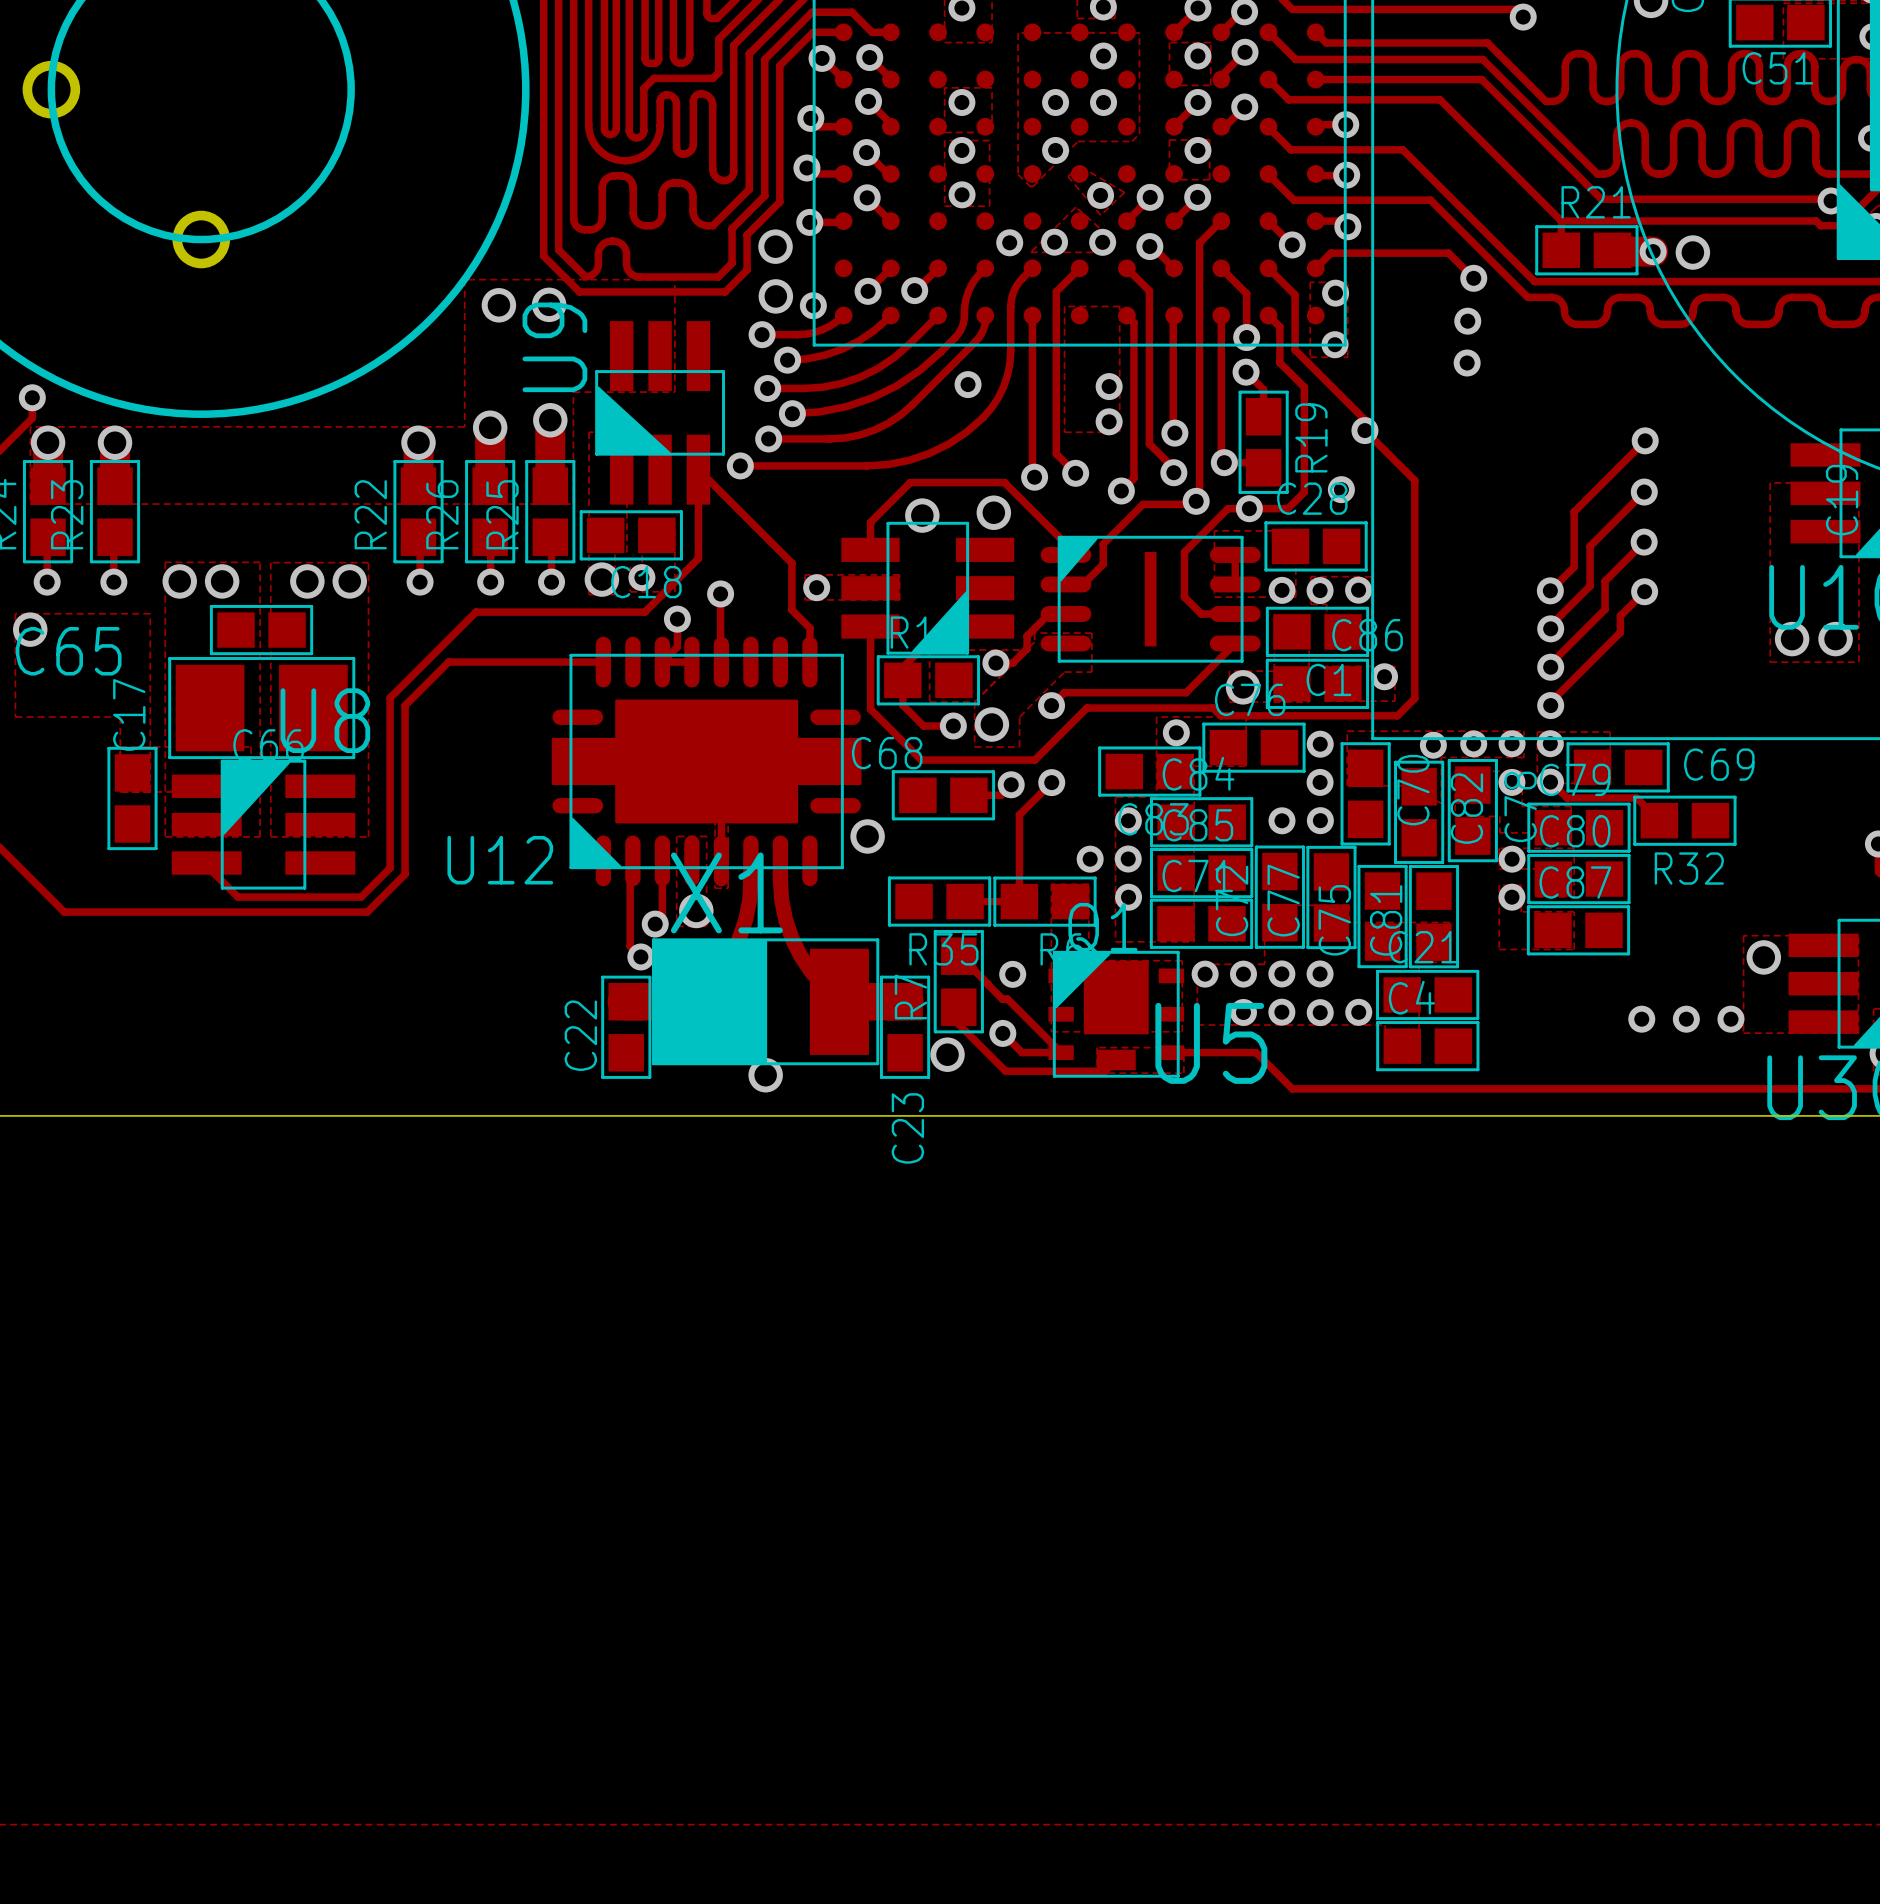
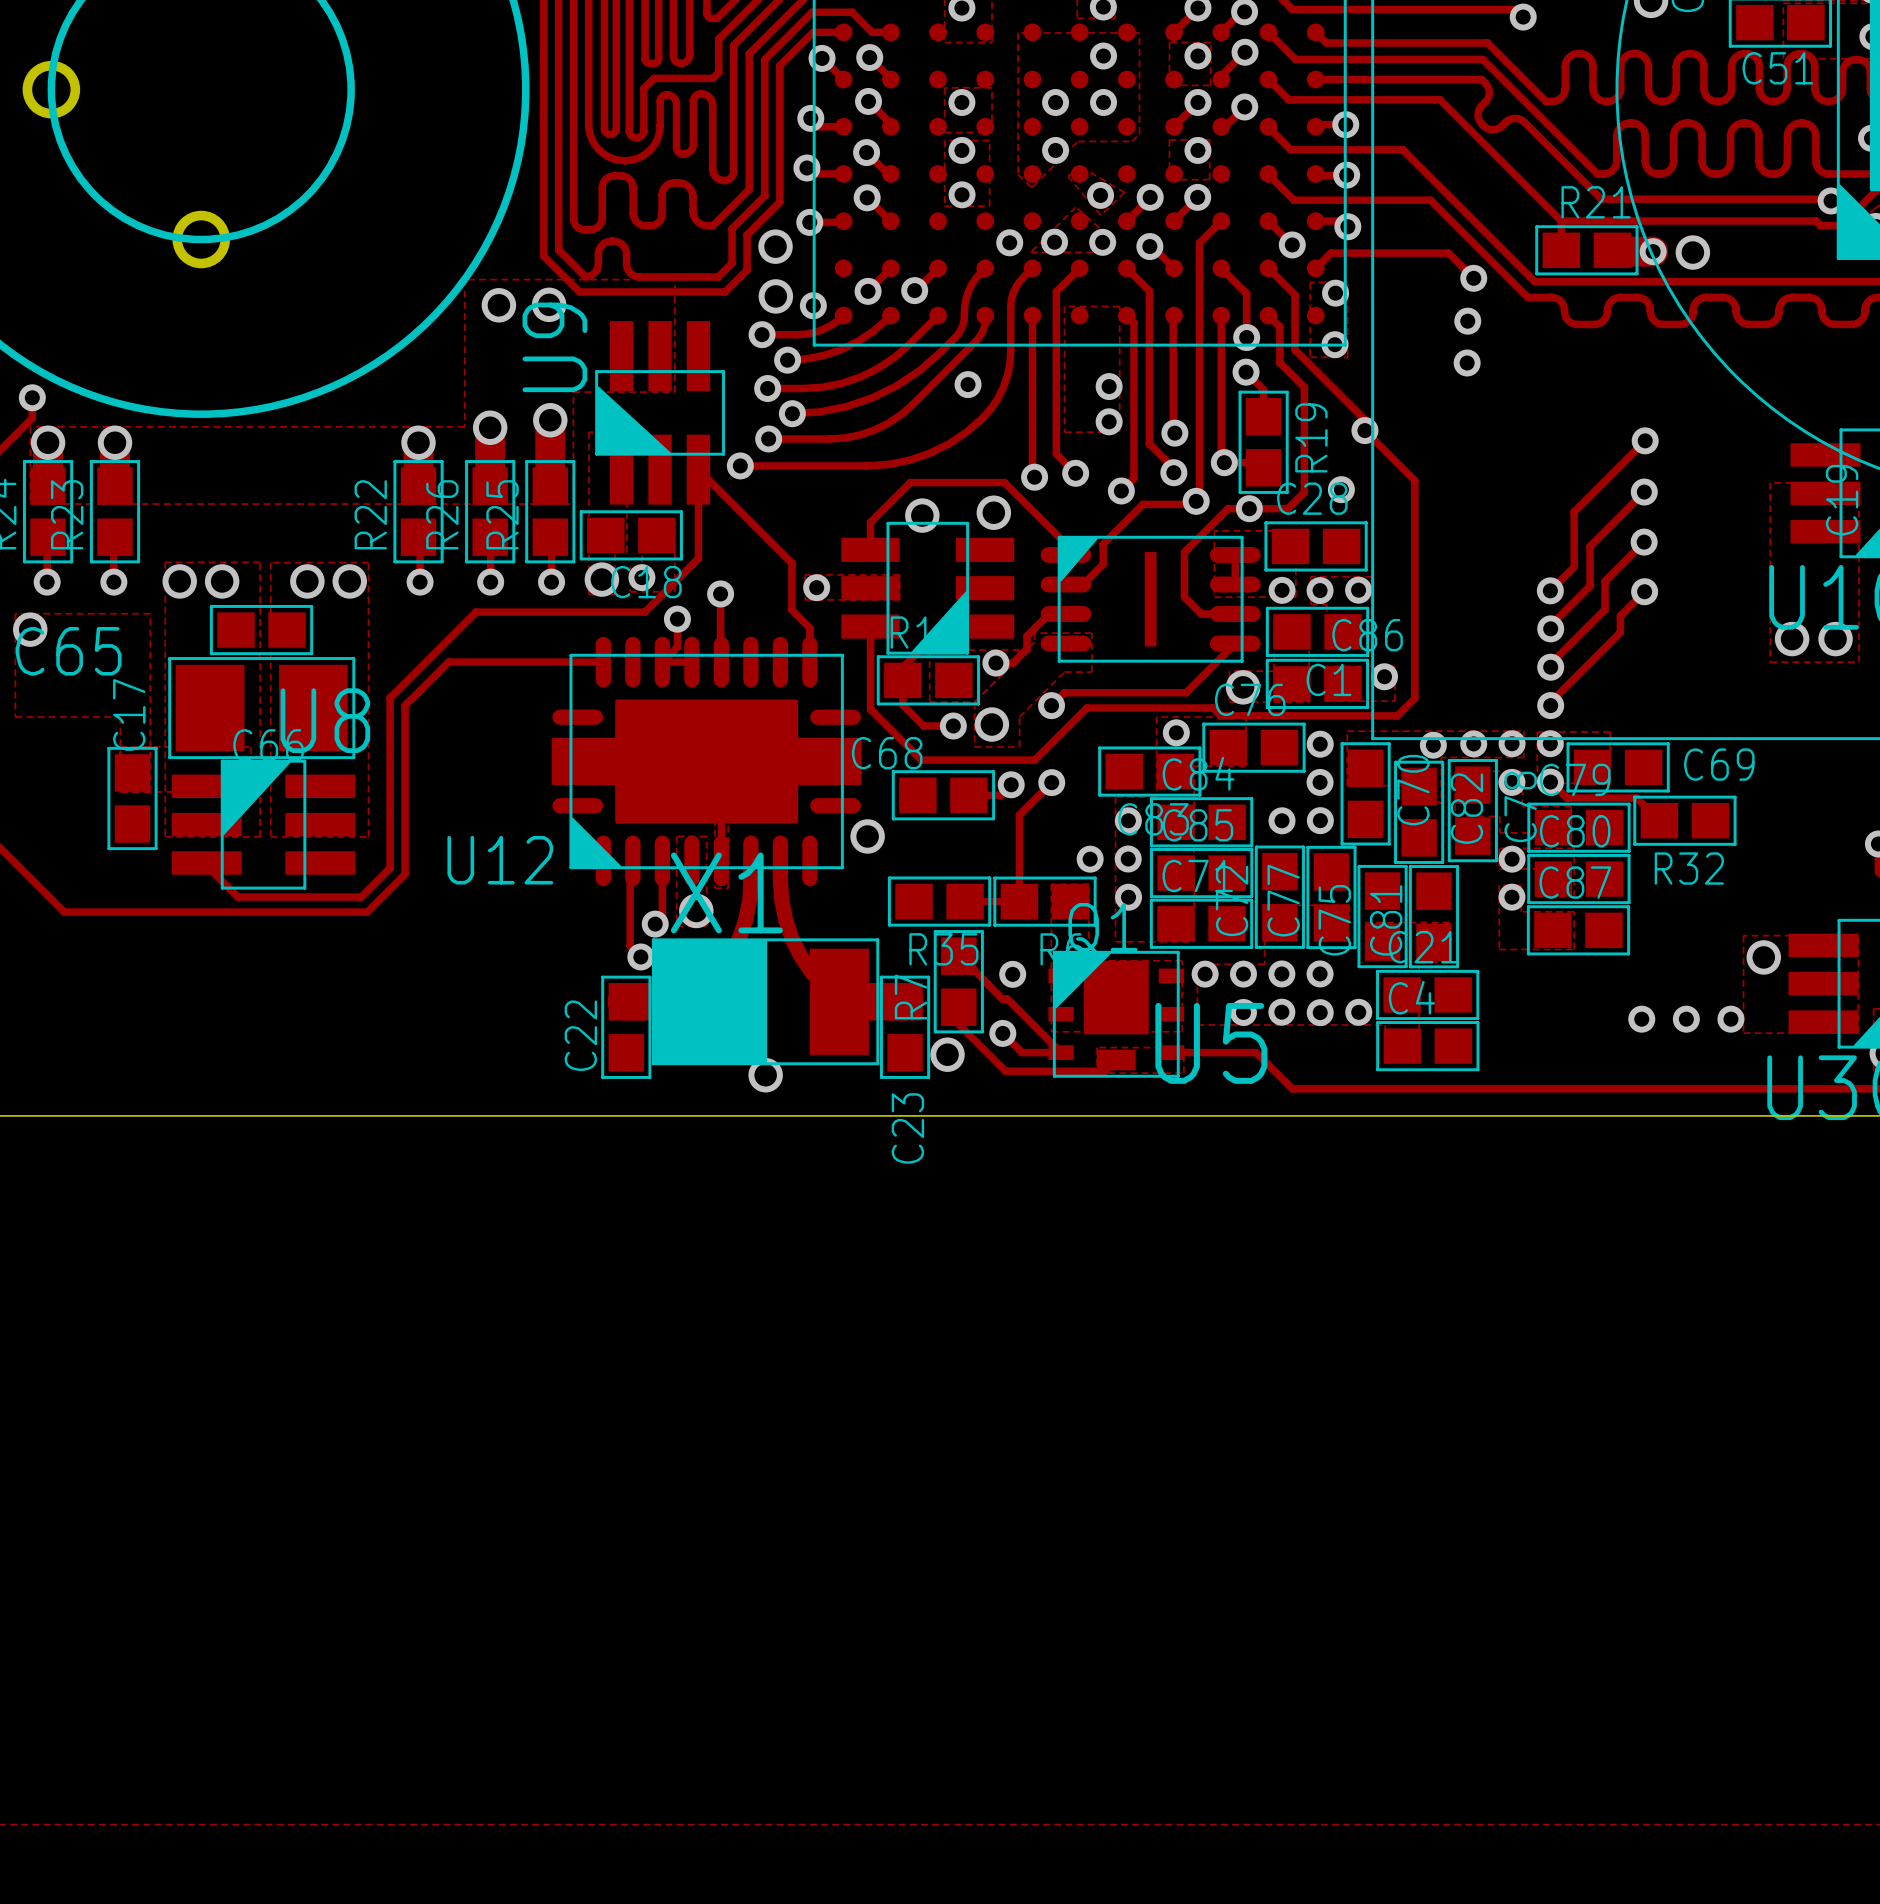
track: (1485, 83) (1524, 122) -> (1485, 83) (1489, 94) (1478, 111) (1478, 118) (1481, 124) (1492, 129) (1499, 128) (1511, 118) (1518, 118) (1524, 122)

